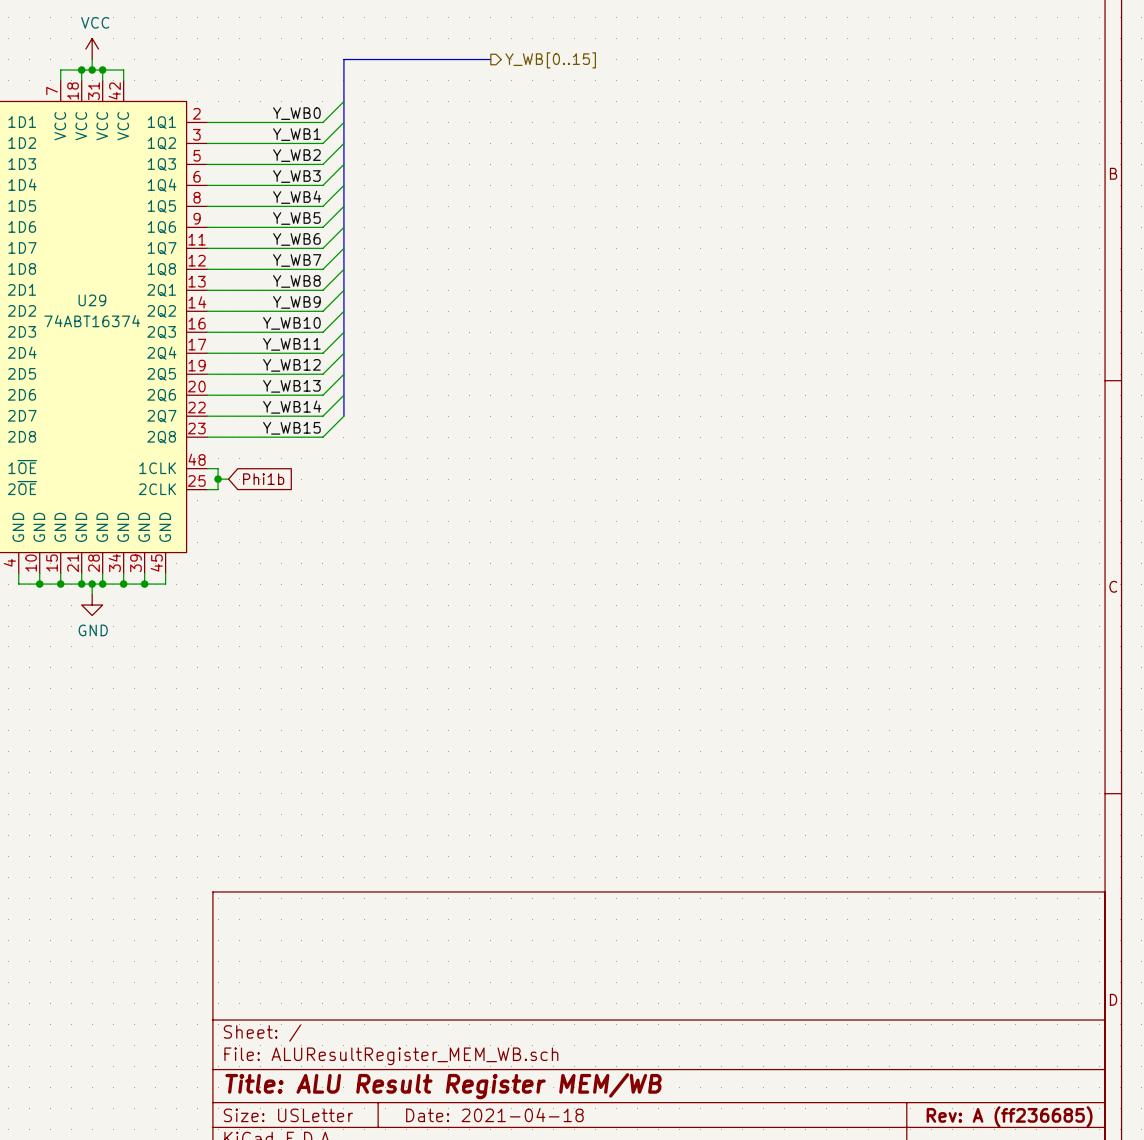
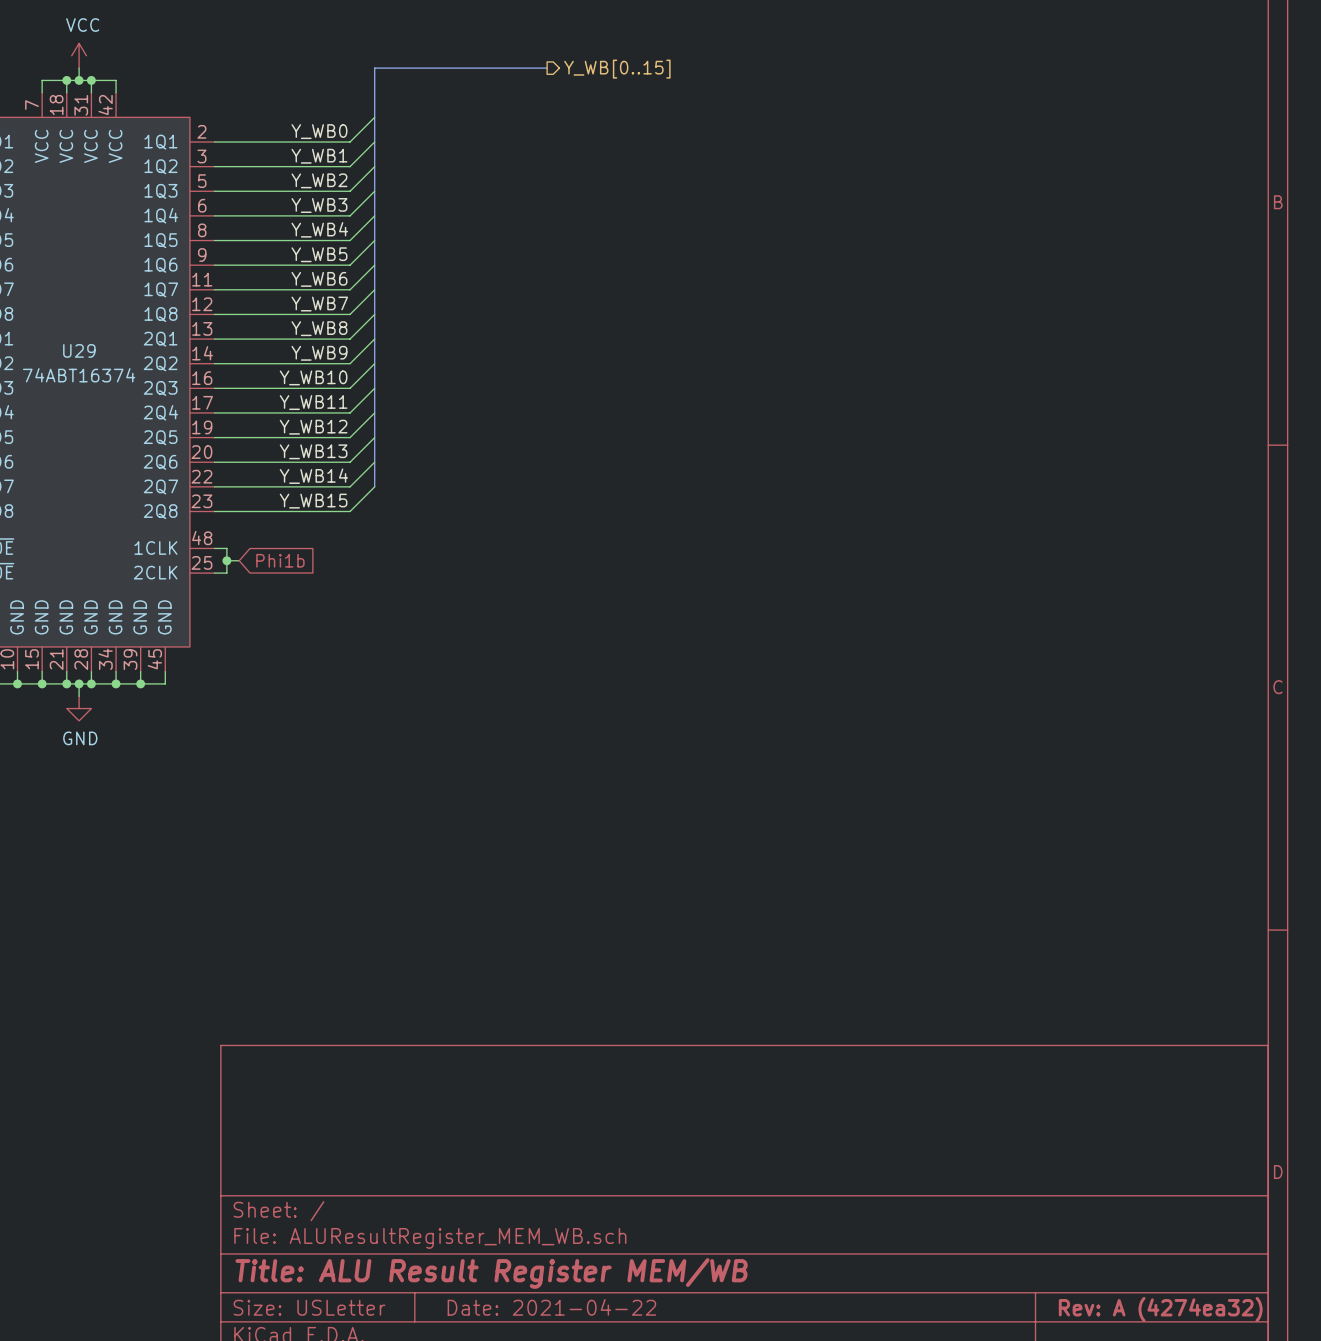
title block: Date: 2021-04-18 (494, 1115) -> Date: 2021-04-22 (551, 1307)
title block: Rev: A (ff236685) (1009, 1116) -> Rev: A (4274ea32) (1160, 1309)

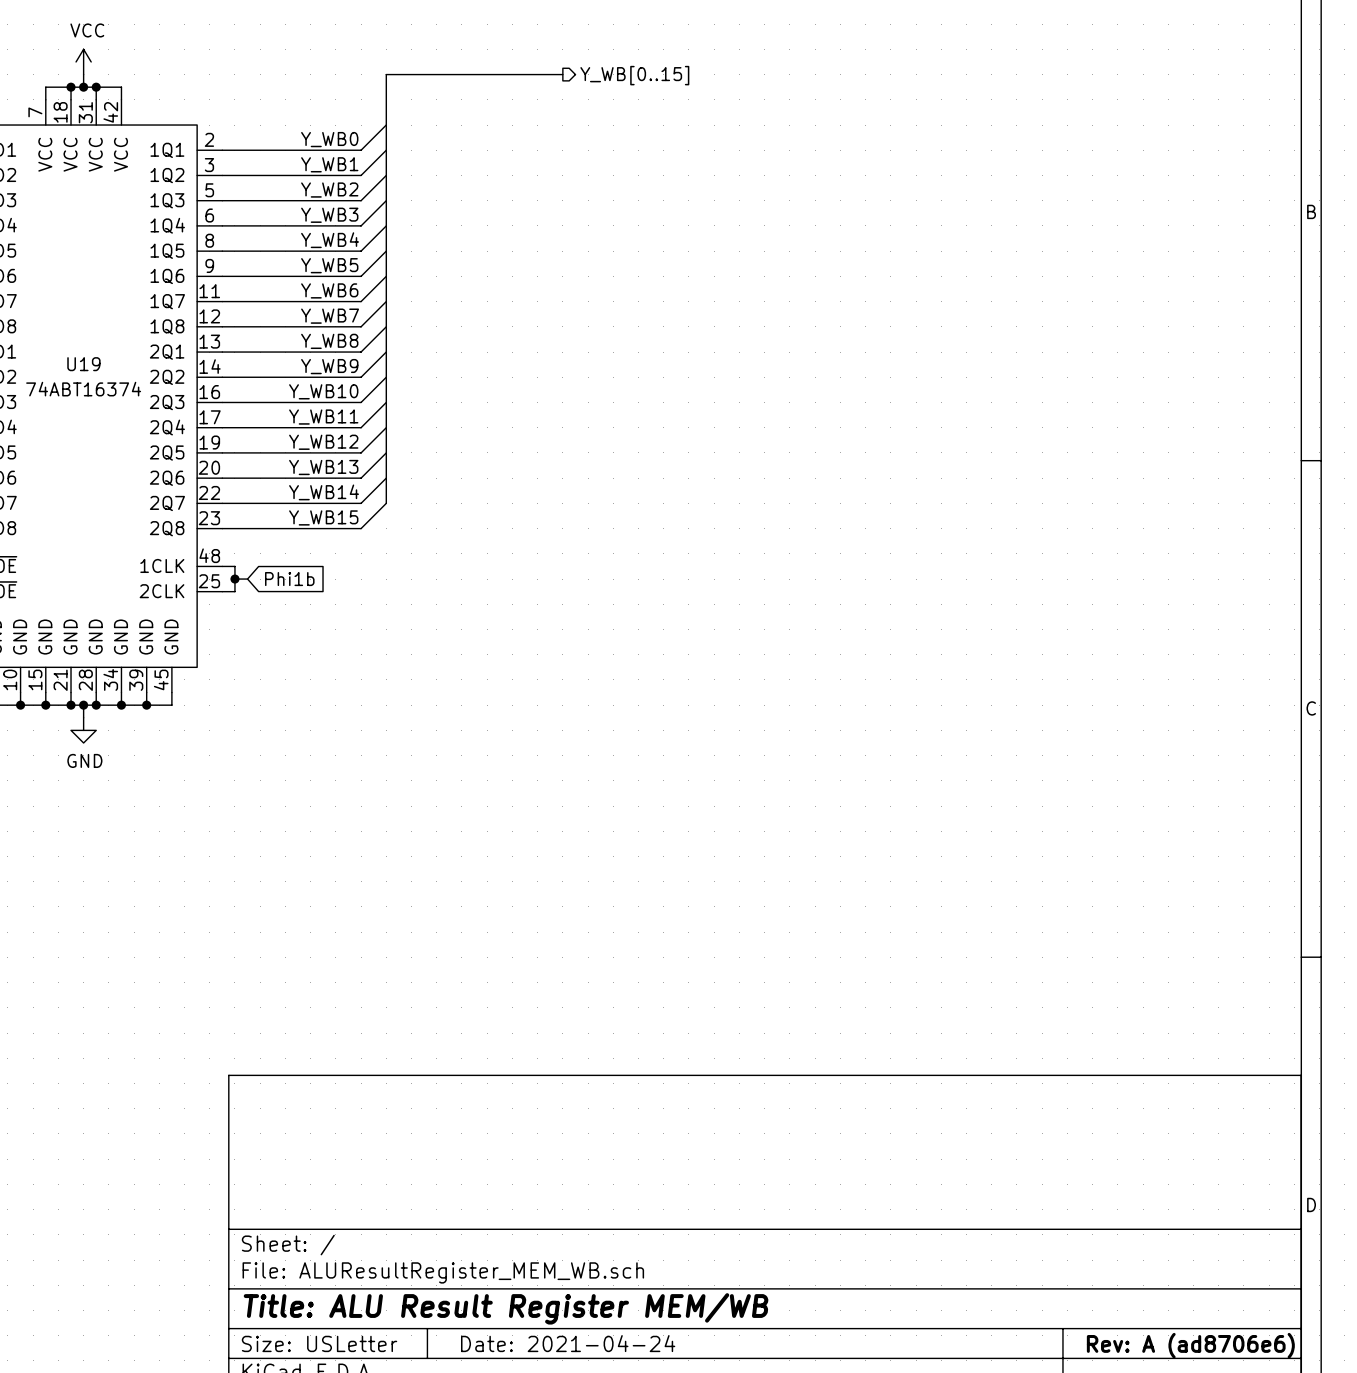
U29 name: U29 (79, 350) -> U19 (83, 364)
title block: Date: 2021-04-22 (551, 1307) -> Date: 2021-04-24 (568, 1343)
title block: Rev: A (4274ea32) (1160, 1309) -> Rev: A (ad8706e6) (1190, 1345)

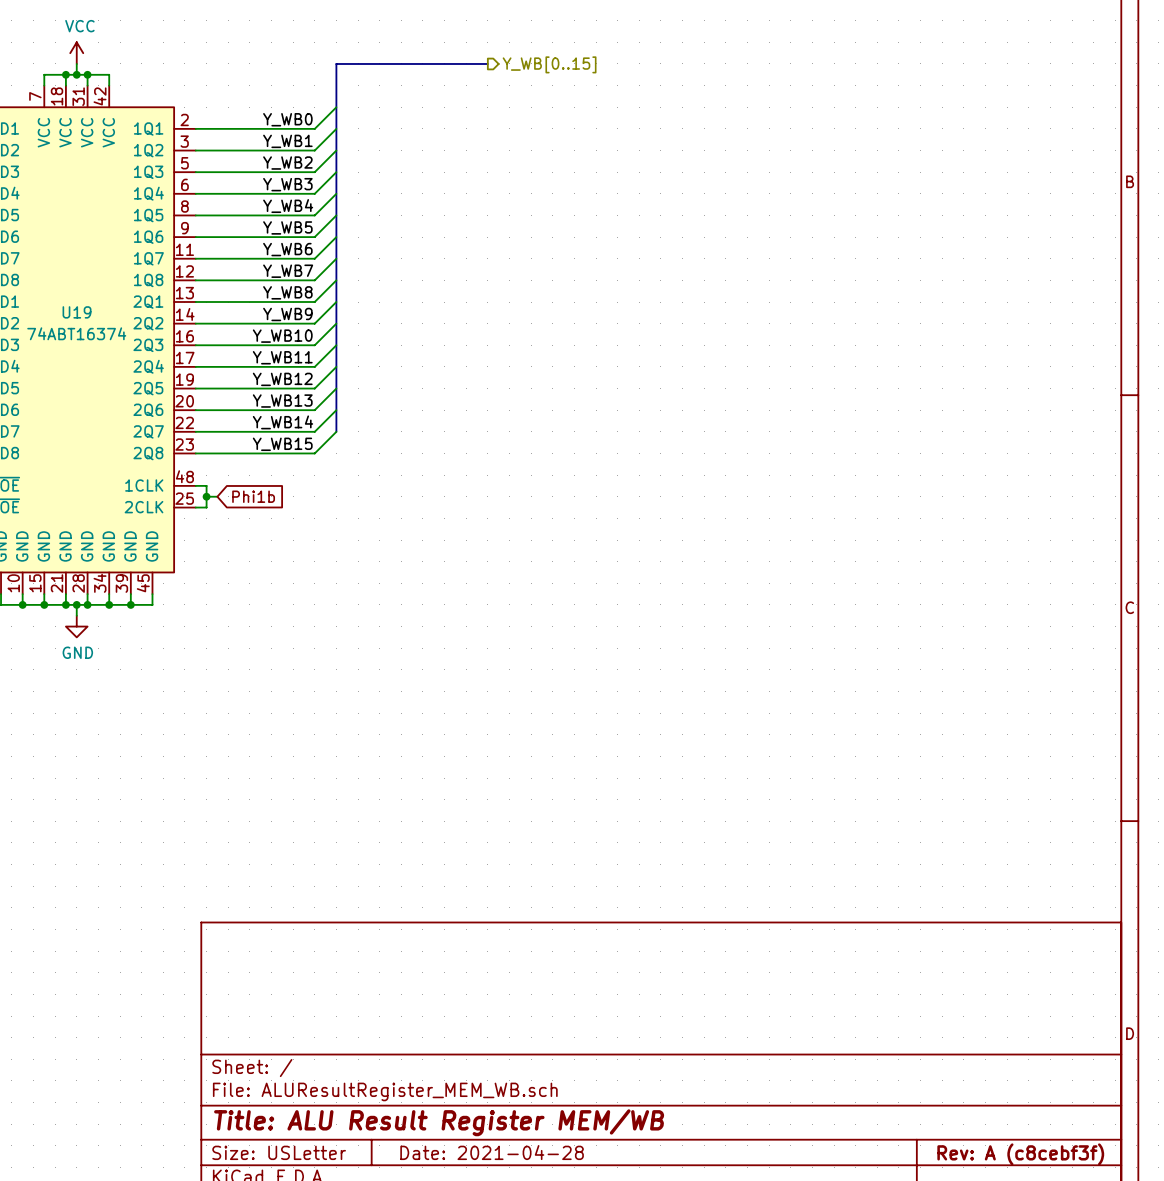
title block: Date: 2021-04-24 (568, 1343) -> Date: 2021-04-28 (492, 1152)
title block: Rev: A (ad8706e6) (1190, 1345) -> Rev: A (c8cebf3f) (1020, 1154)

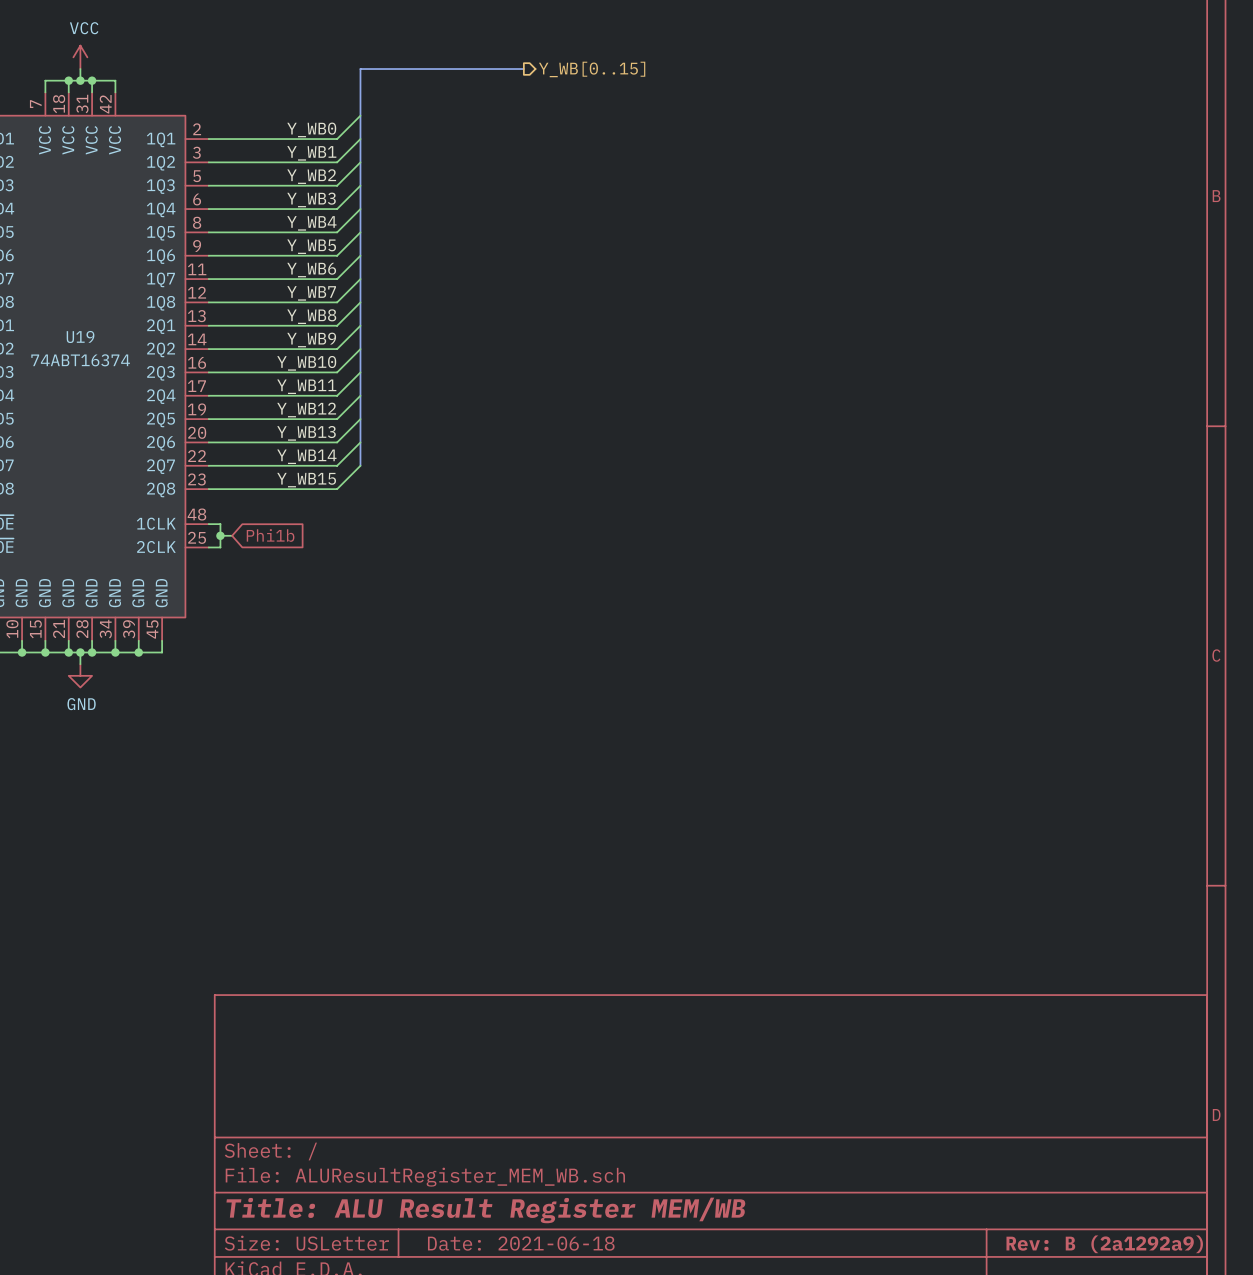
title block: Date: 2021-04-28 (492, 1152) -> Date: 2021-06-18 (521, 1243)
title block: Rev: A (c8cebf3f) (1020, 1154) -> Rev: B (2a1292a9) (1104, 1244)

